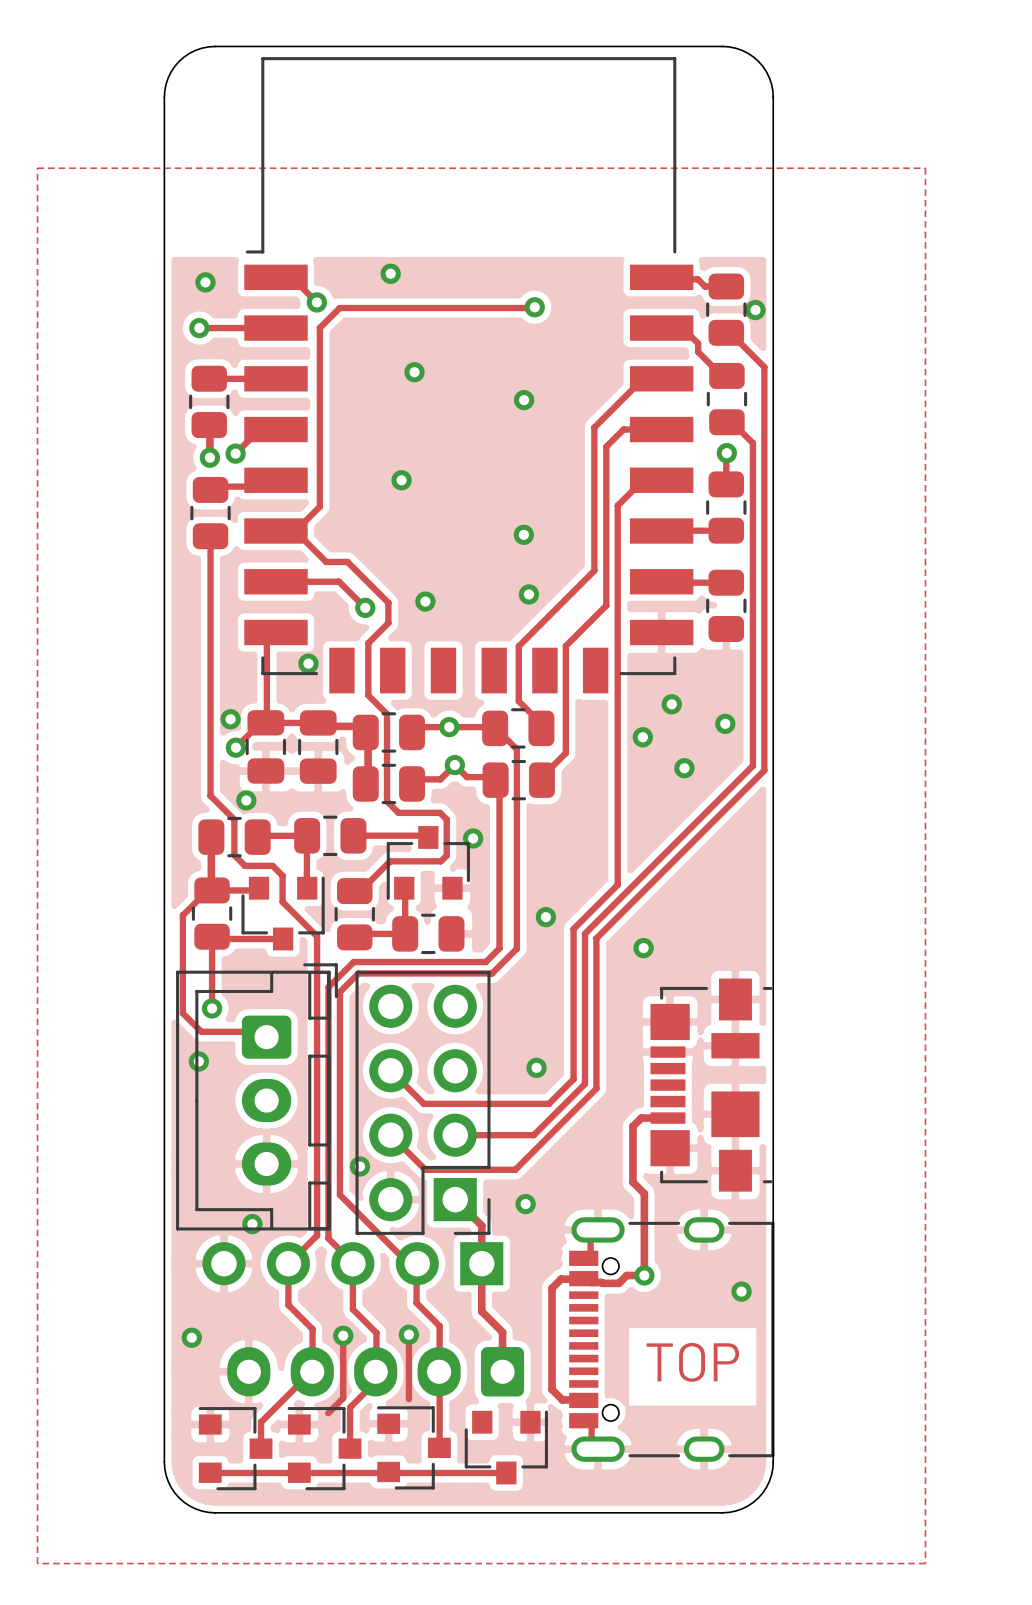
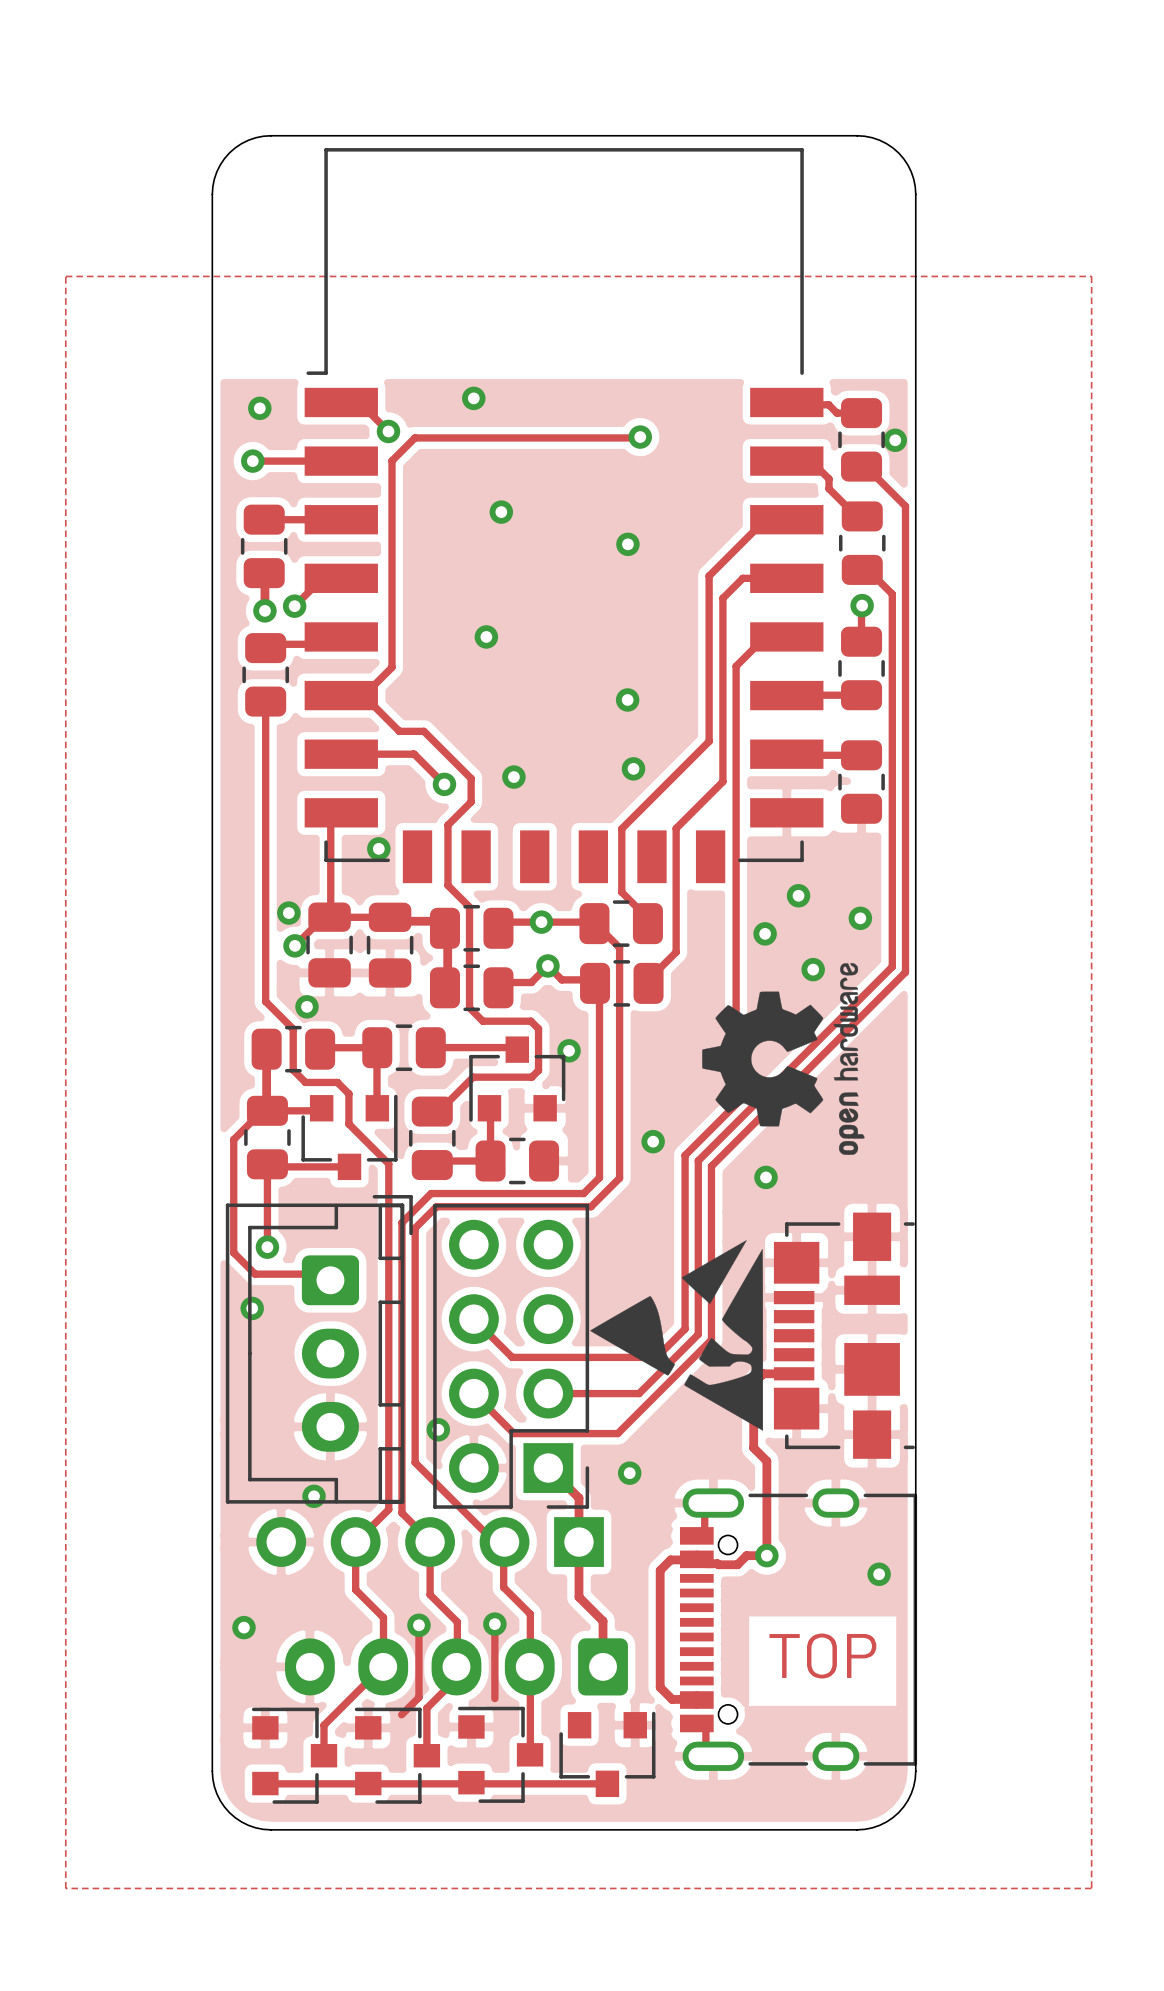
drawing: none -> [702, 963, 865, 1155]
drawing: none -> [590, 1240, 764, 1431]

